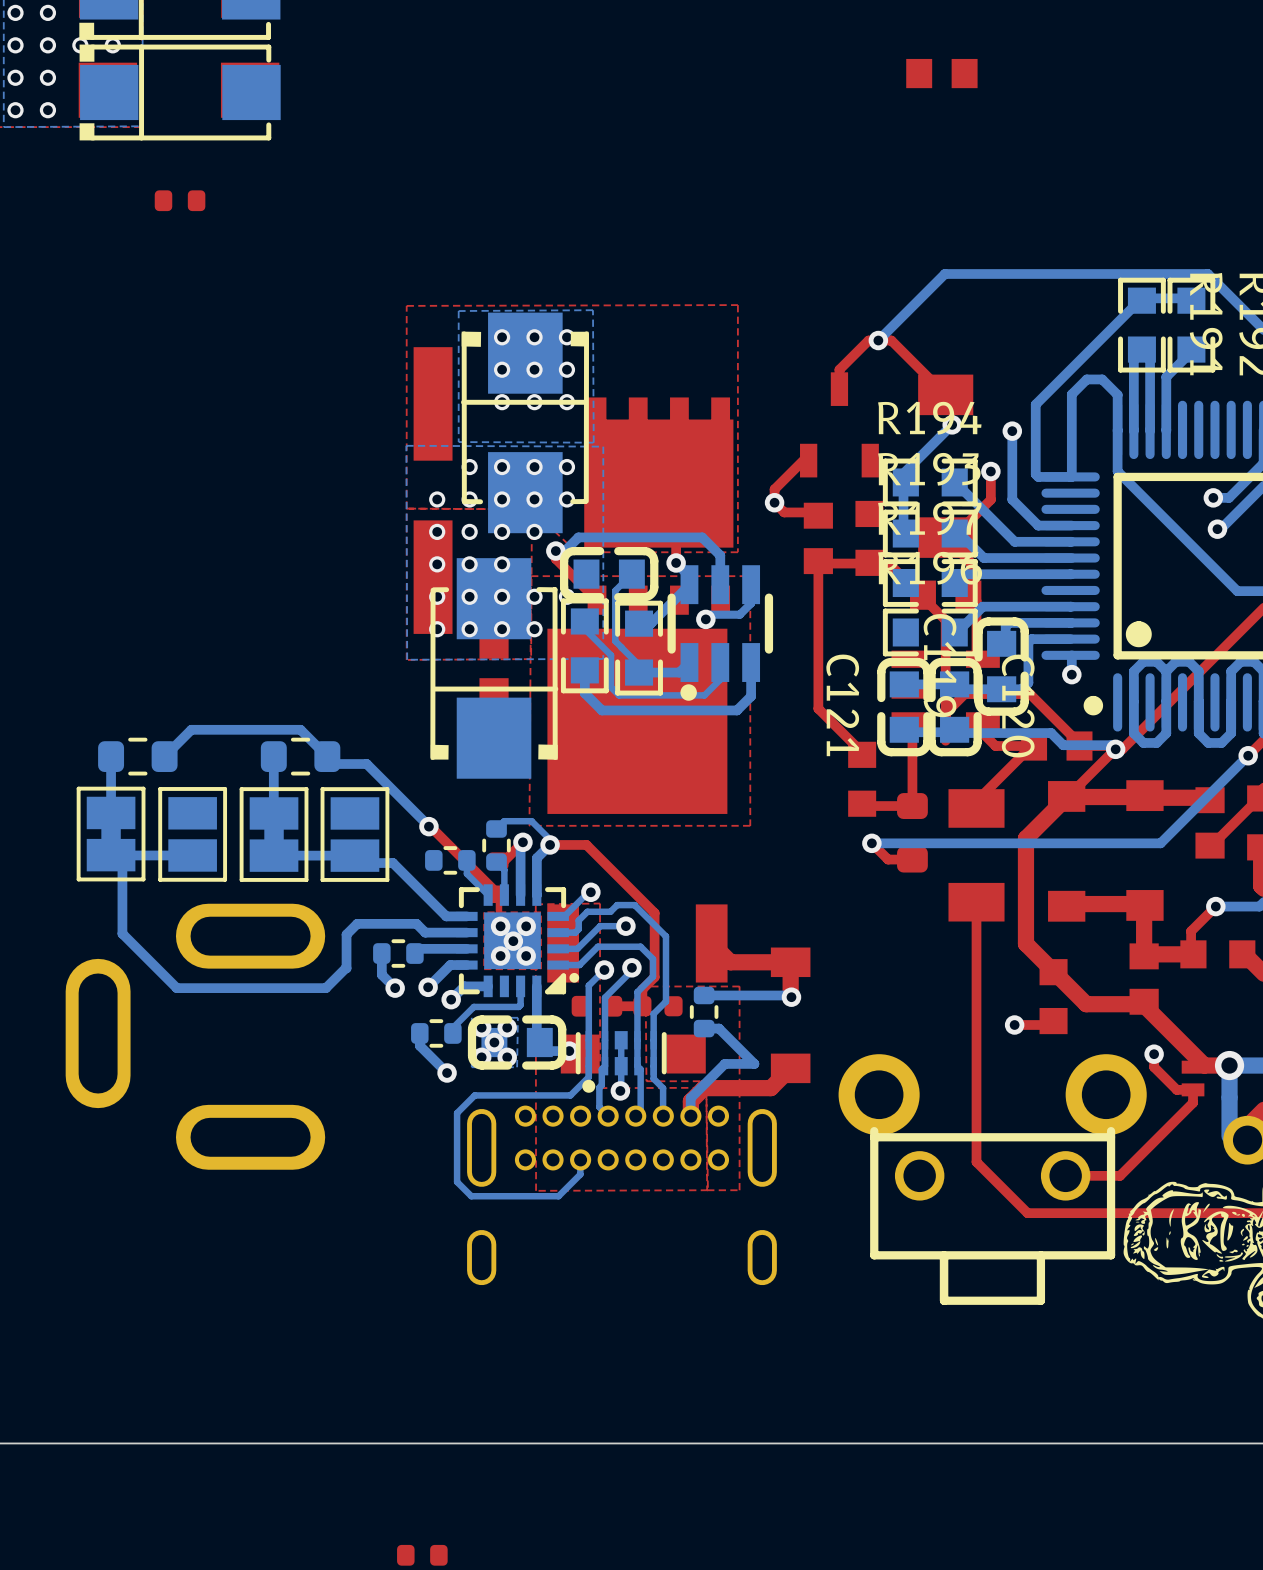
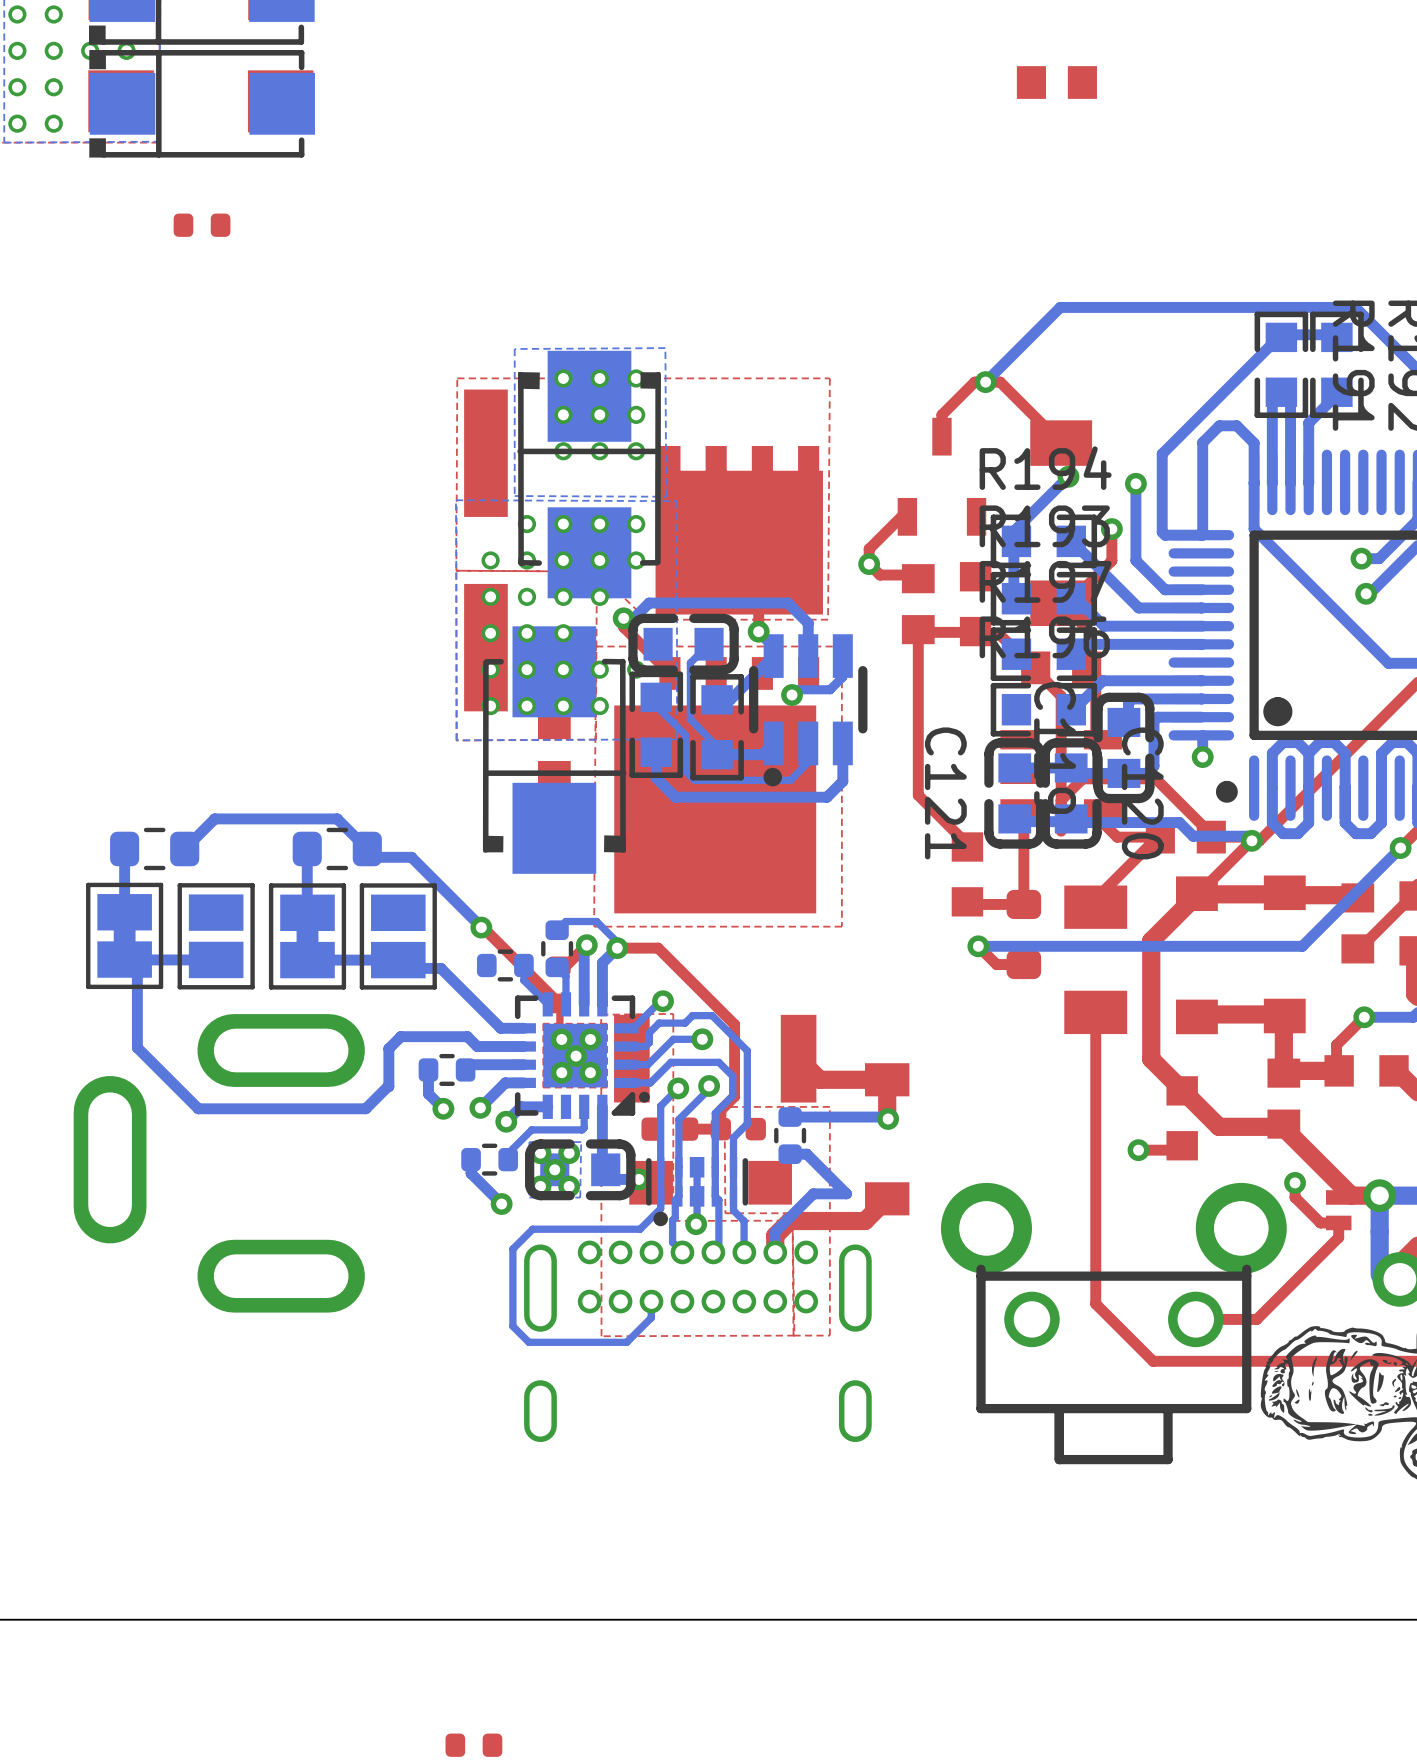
top zone outline: (406, 508) (406, 305) (737, 305) (737, 552) -> (456, 570) (457, 378) (829, 378) (828, 619)

